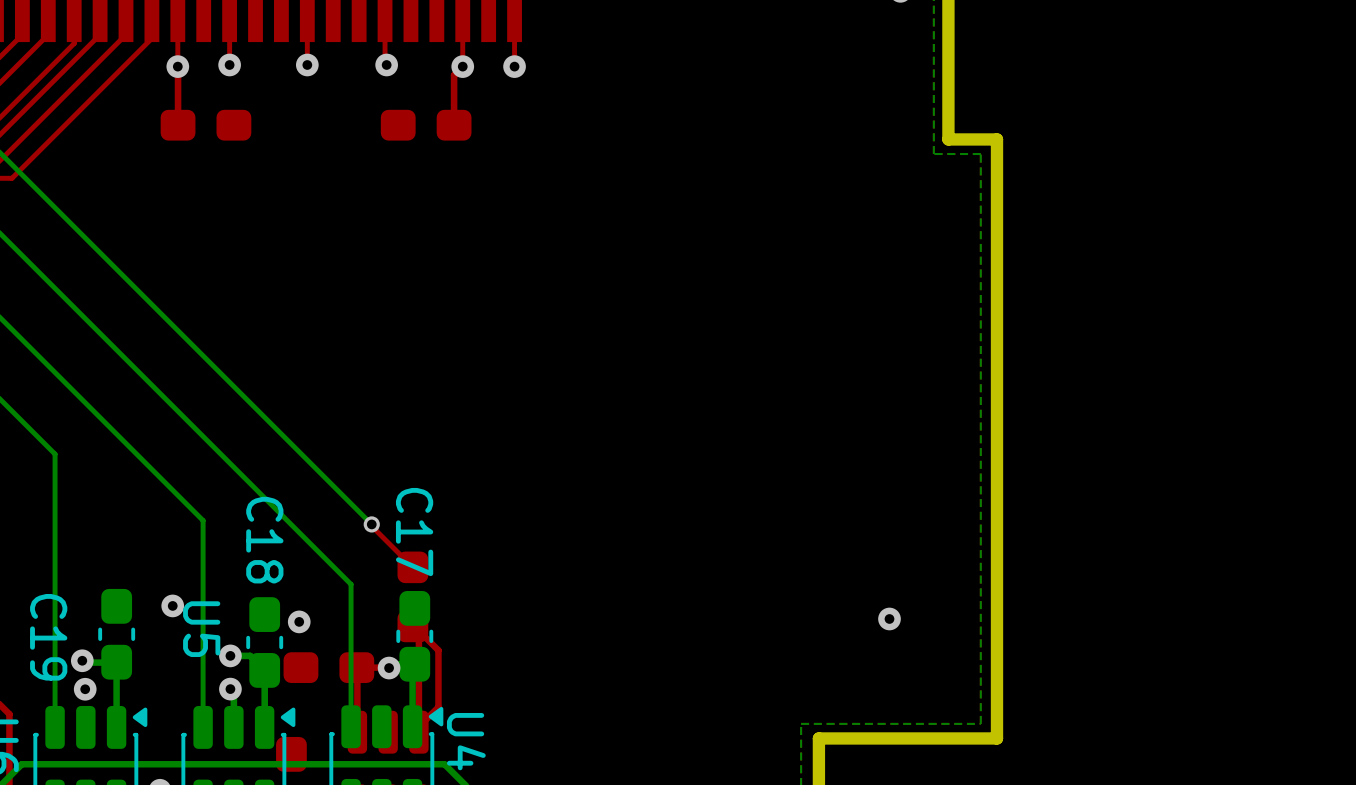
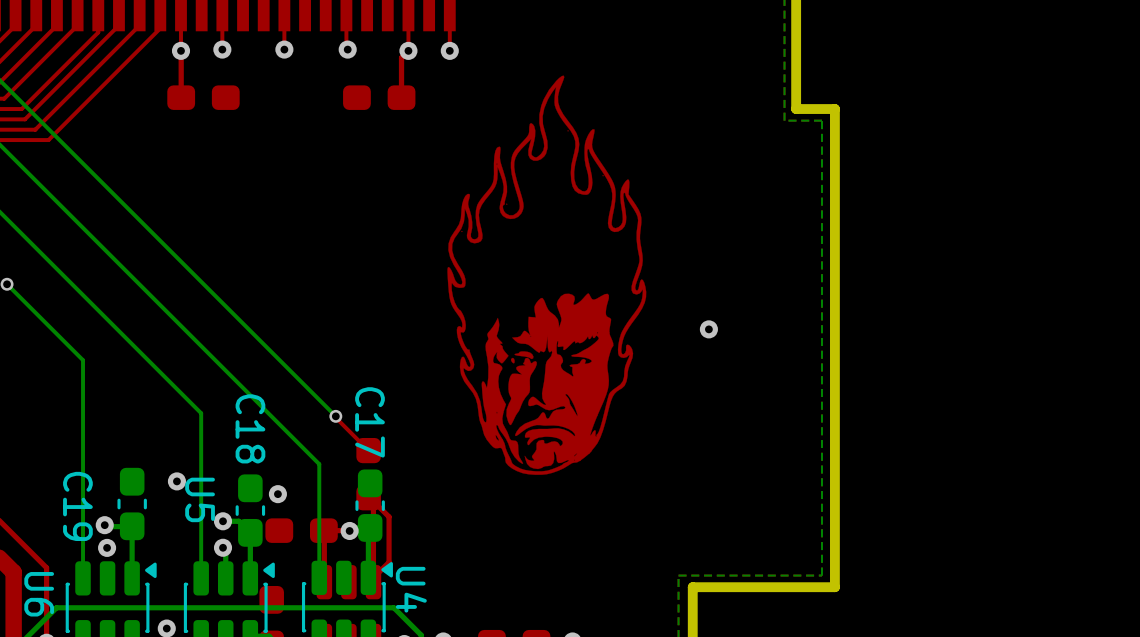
drawing: none -> [447, 75, 647, 475]
via: none -> (708, 329)
via: (889, 618) -> none

